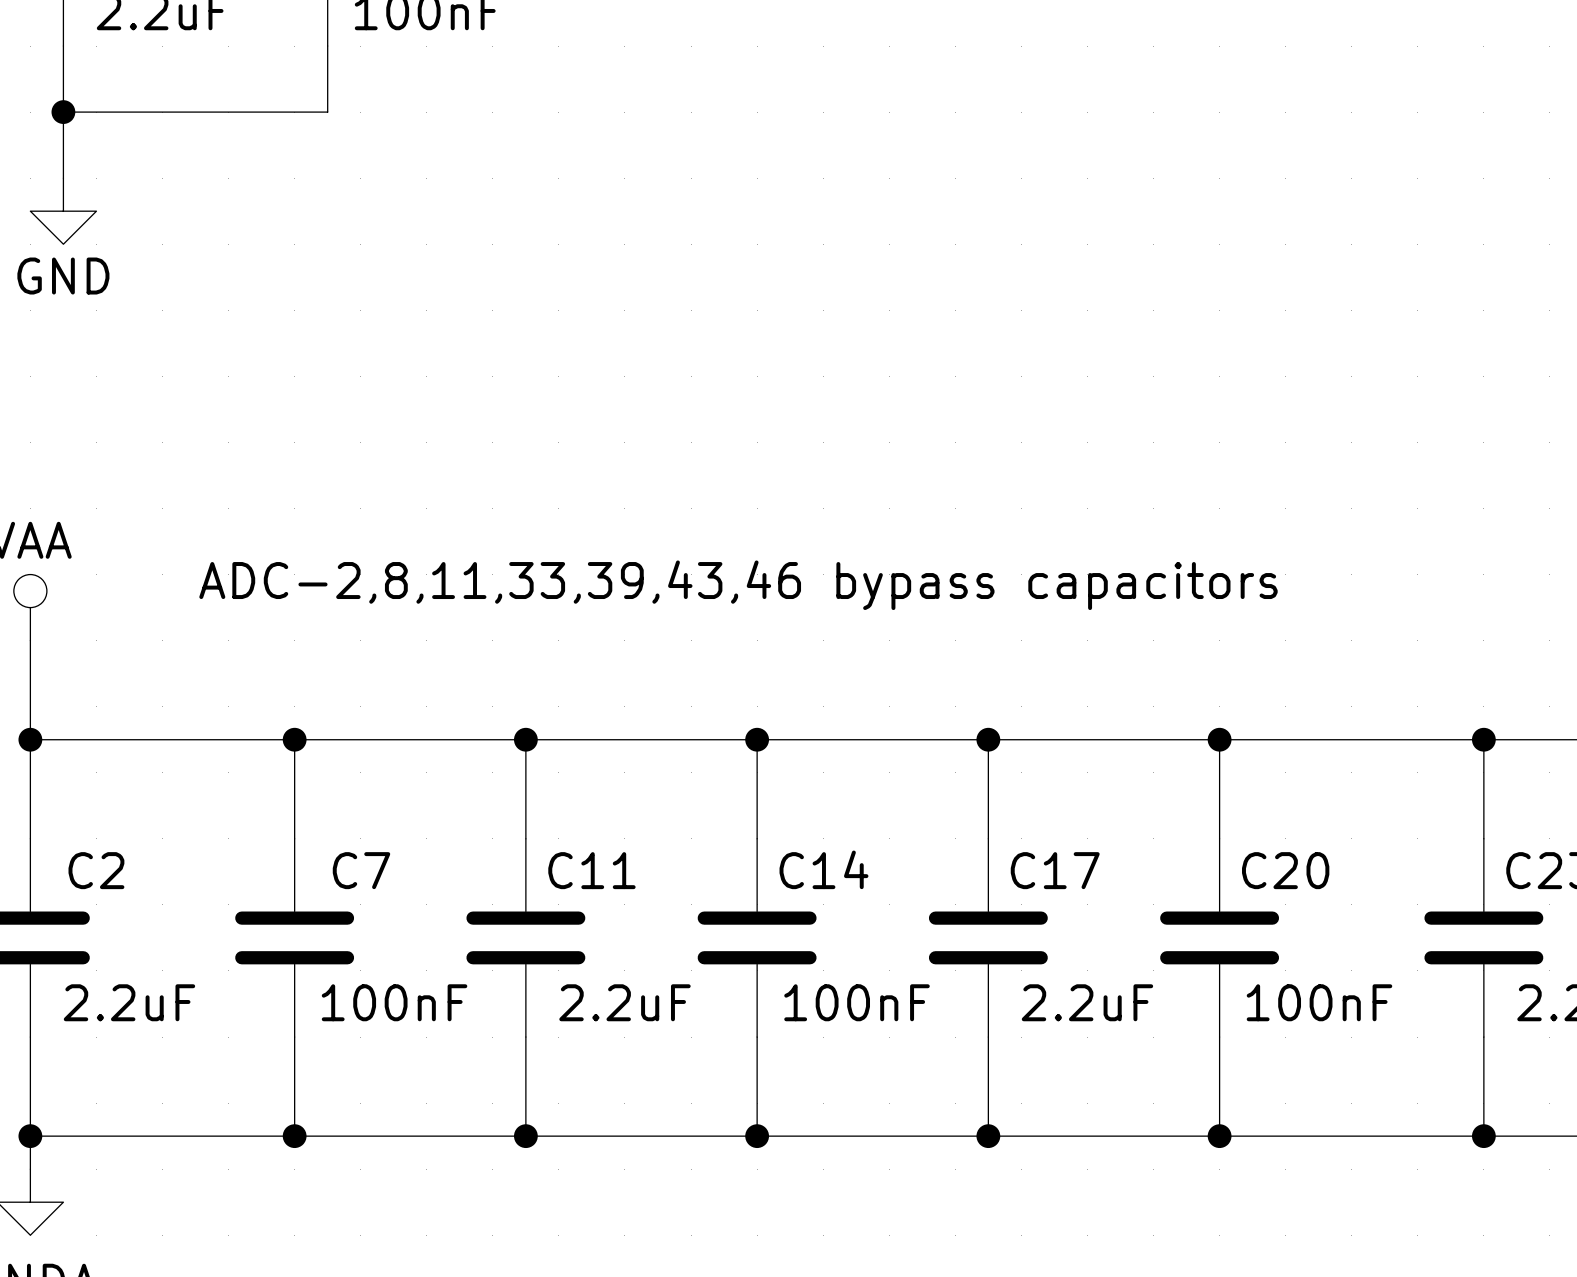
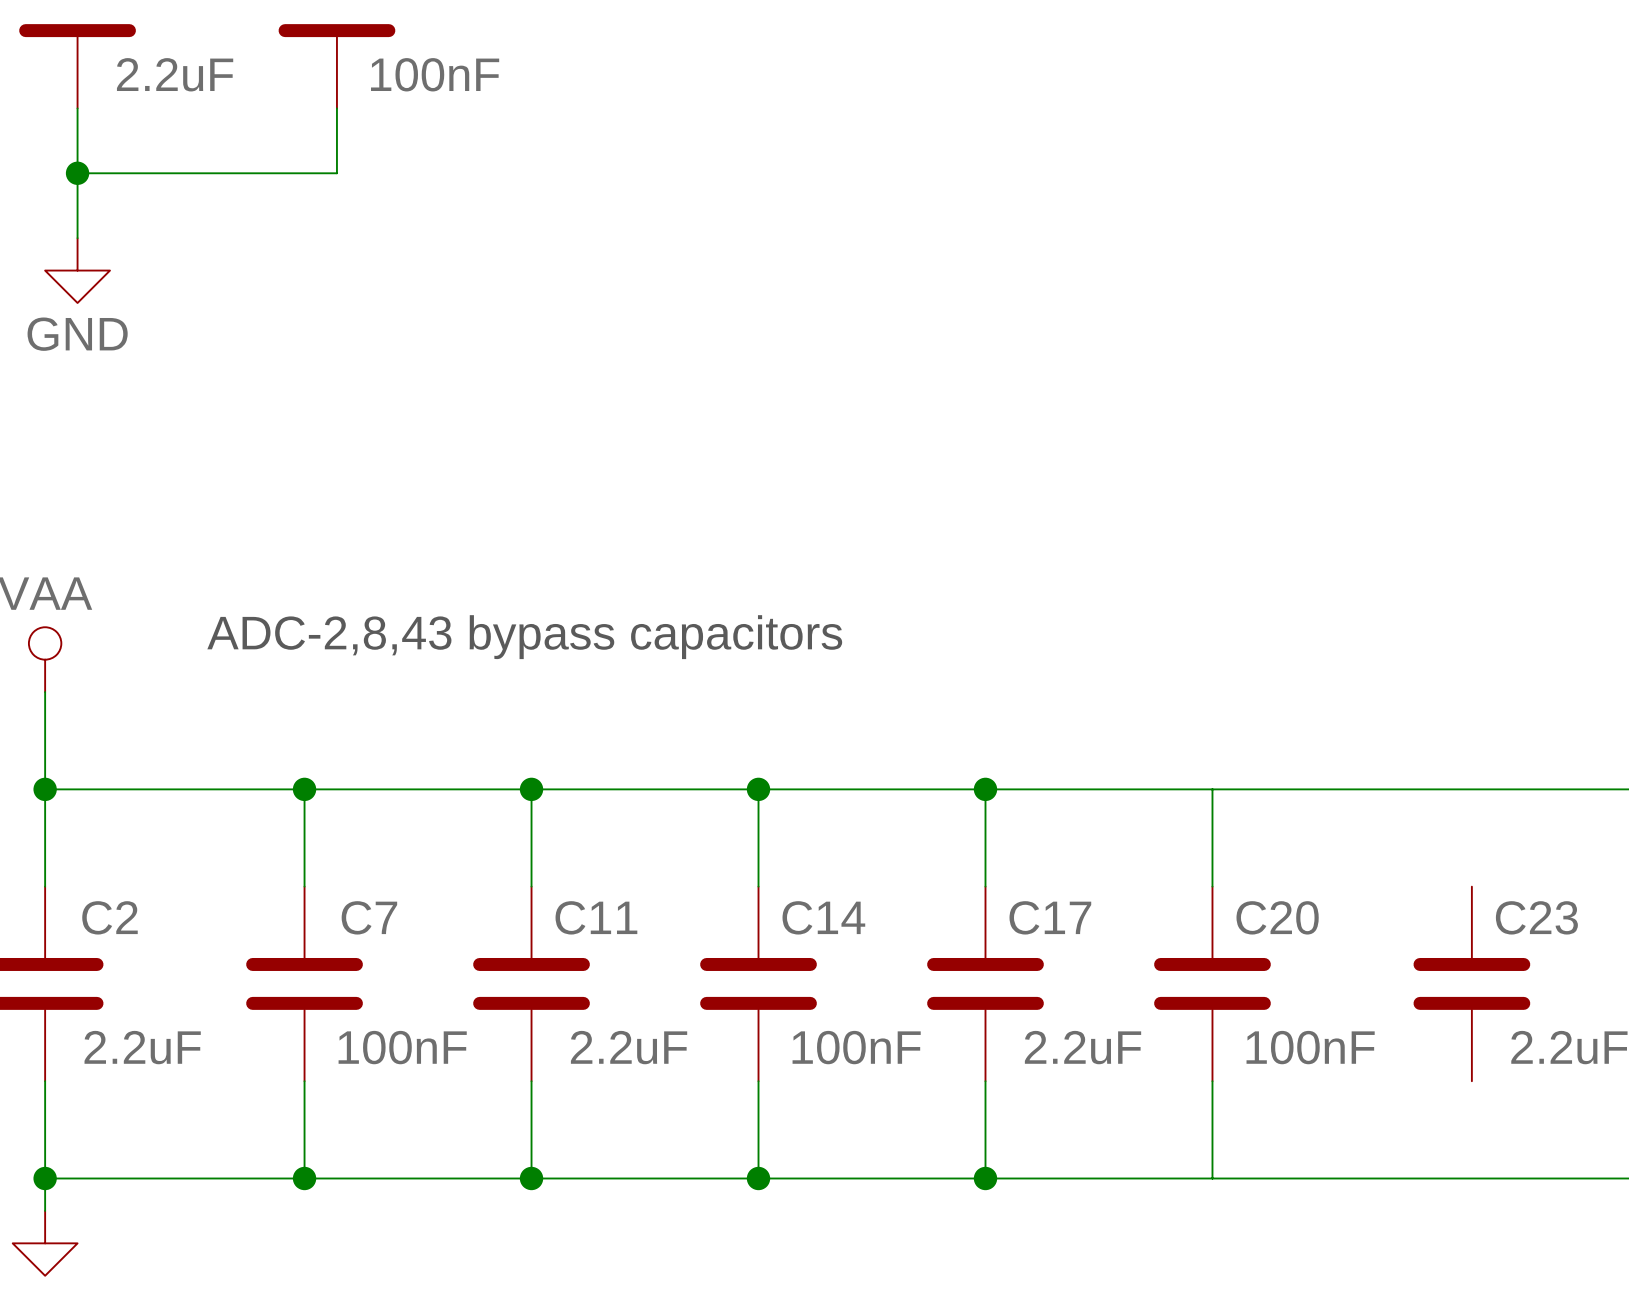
text: ADC-2,8,11,33,39,43,46 bypass capacitors (738, 585) -> ADC-2,8,43 bypass capacitors (524, 637)
junction: (1219, 739) -> none
wire: (1483, 739) (1483, 838) -> none
junction: (1483, 739) -> none
wire: (1483, 1037) (1483, 1136) -> none
junction: (1219, 1136) -> none
junction: (1483, 1136) -> none

